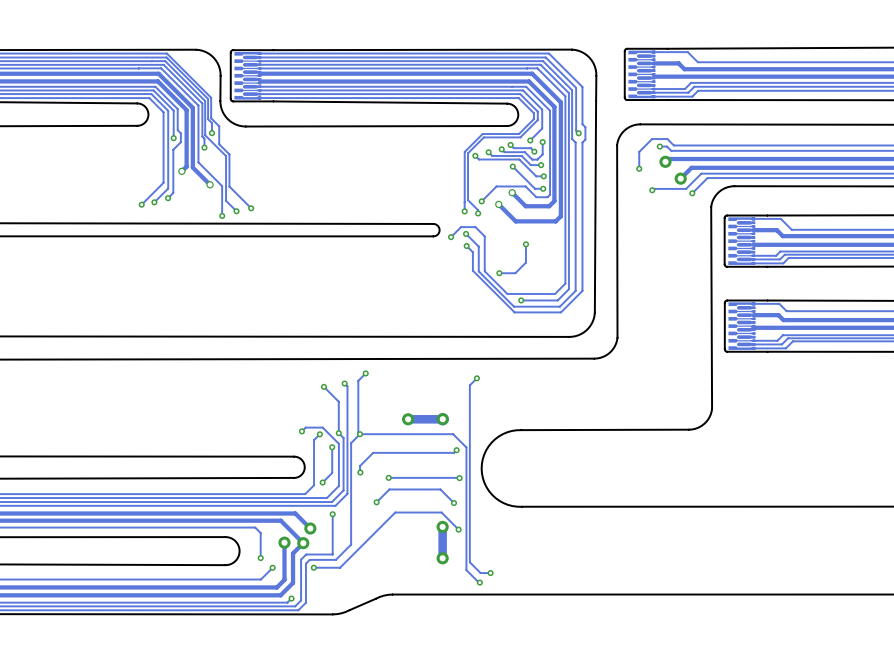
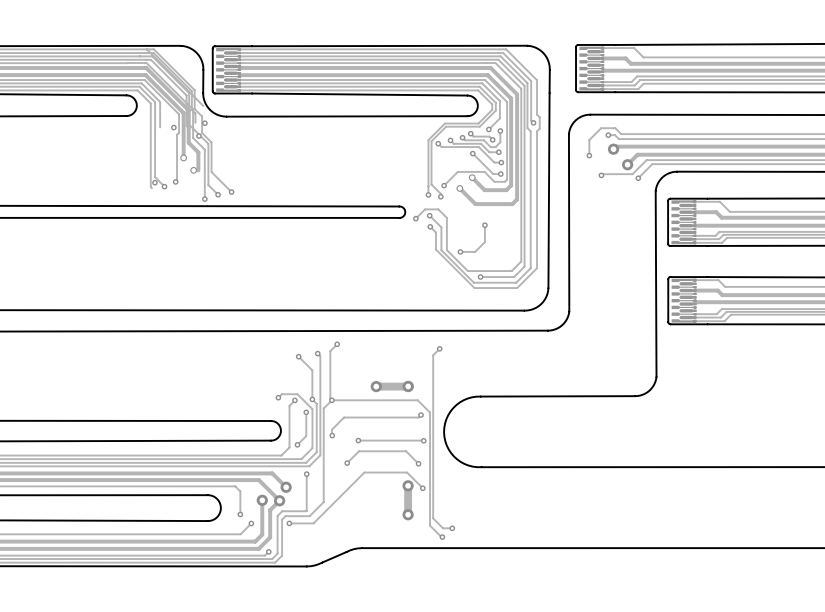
track: none -> (146, 49) (203, 105)
track: (158, 68) (161, 68) (198, 105) (198, 162) (222, 186) -> (146, 63) (193, 109) (193, 137) (204, 149) (204, 171)
track: (155, 86) (177, 109) (177, 130) (180, 133) (180, 142) (173, 149) (173, 192) (168, 198) -> (143, 80) (179, 114) (175, 181)
track: (192, 107) (192, 167) (210, 184) -> (177, 99) (188, 110) (188, 142) (198, 152) (198, 170)
track: (186, 110) (186, 166) (181, 171) -> (172, 101) (183, 113) (183, 157)
via: (212, 133) -> none
via: none -> (204, 123)
via: (173, 138) -> none
via: none -> (173, 127)
via: (204, 147) -> none
via: none -> (198, 136)
via position: (181, 171) -> (183, 157)
track: (163, 182) (141, 204) -> (150, 168) (151, 188)
track: (168, 188) (154, 202) -> (155, 173) (155, 177) (164, 186)
via: none -> (175, 181)
via: (154, 202) -> none
via: none -> (164, 186)
via: (141, 204) -> none

